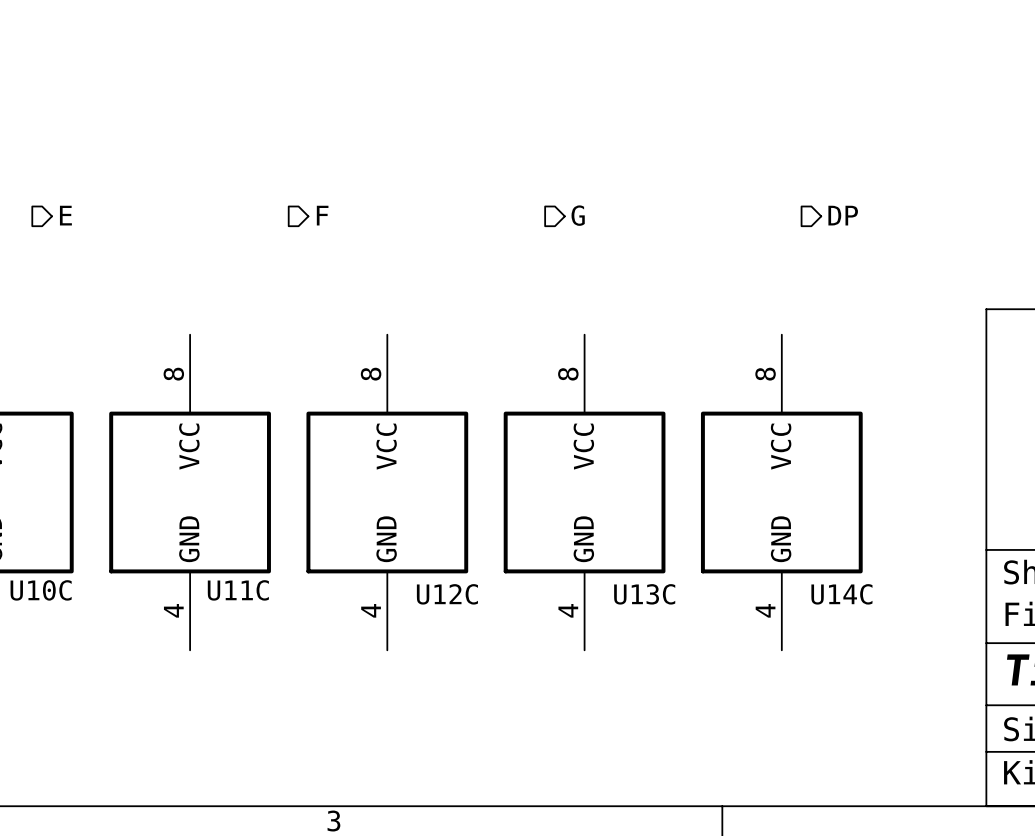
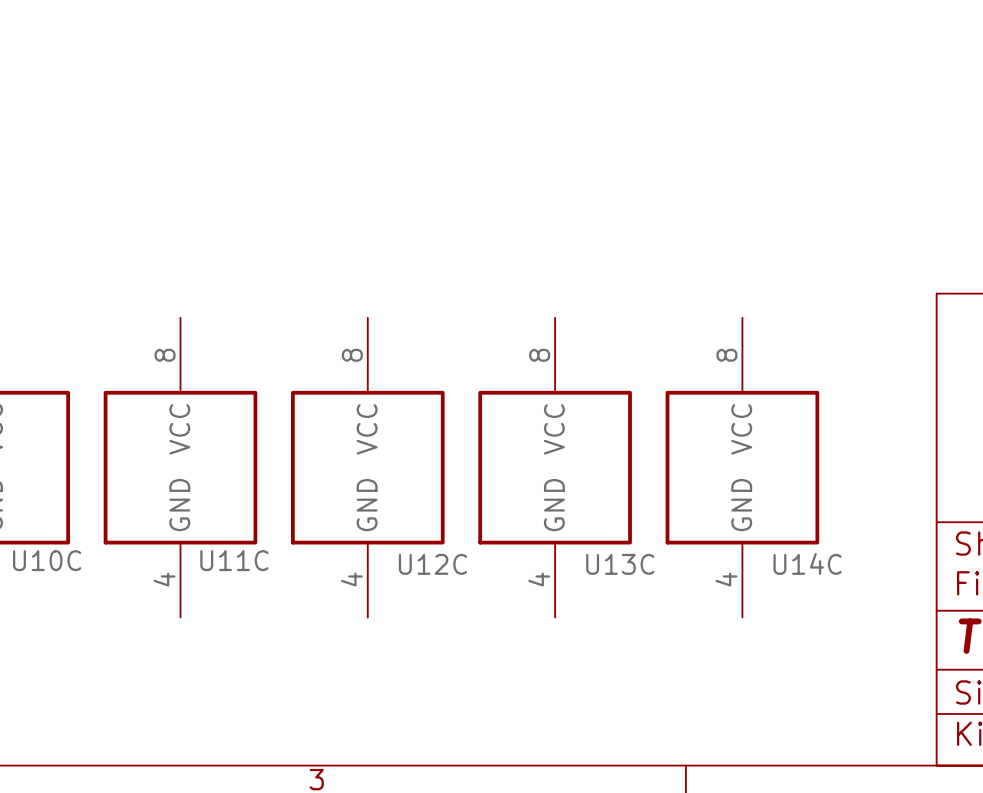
hierarchical label: E (65, 215) -> none
hierarchical label: F (322, 215) -> none
hierarchical label: G (578, 215) -> none
hierarchical label: DP (843, 215) -> none

